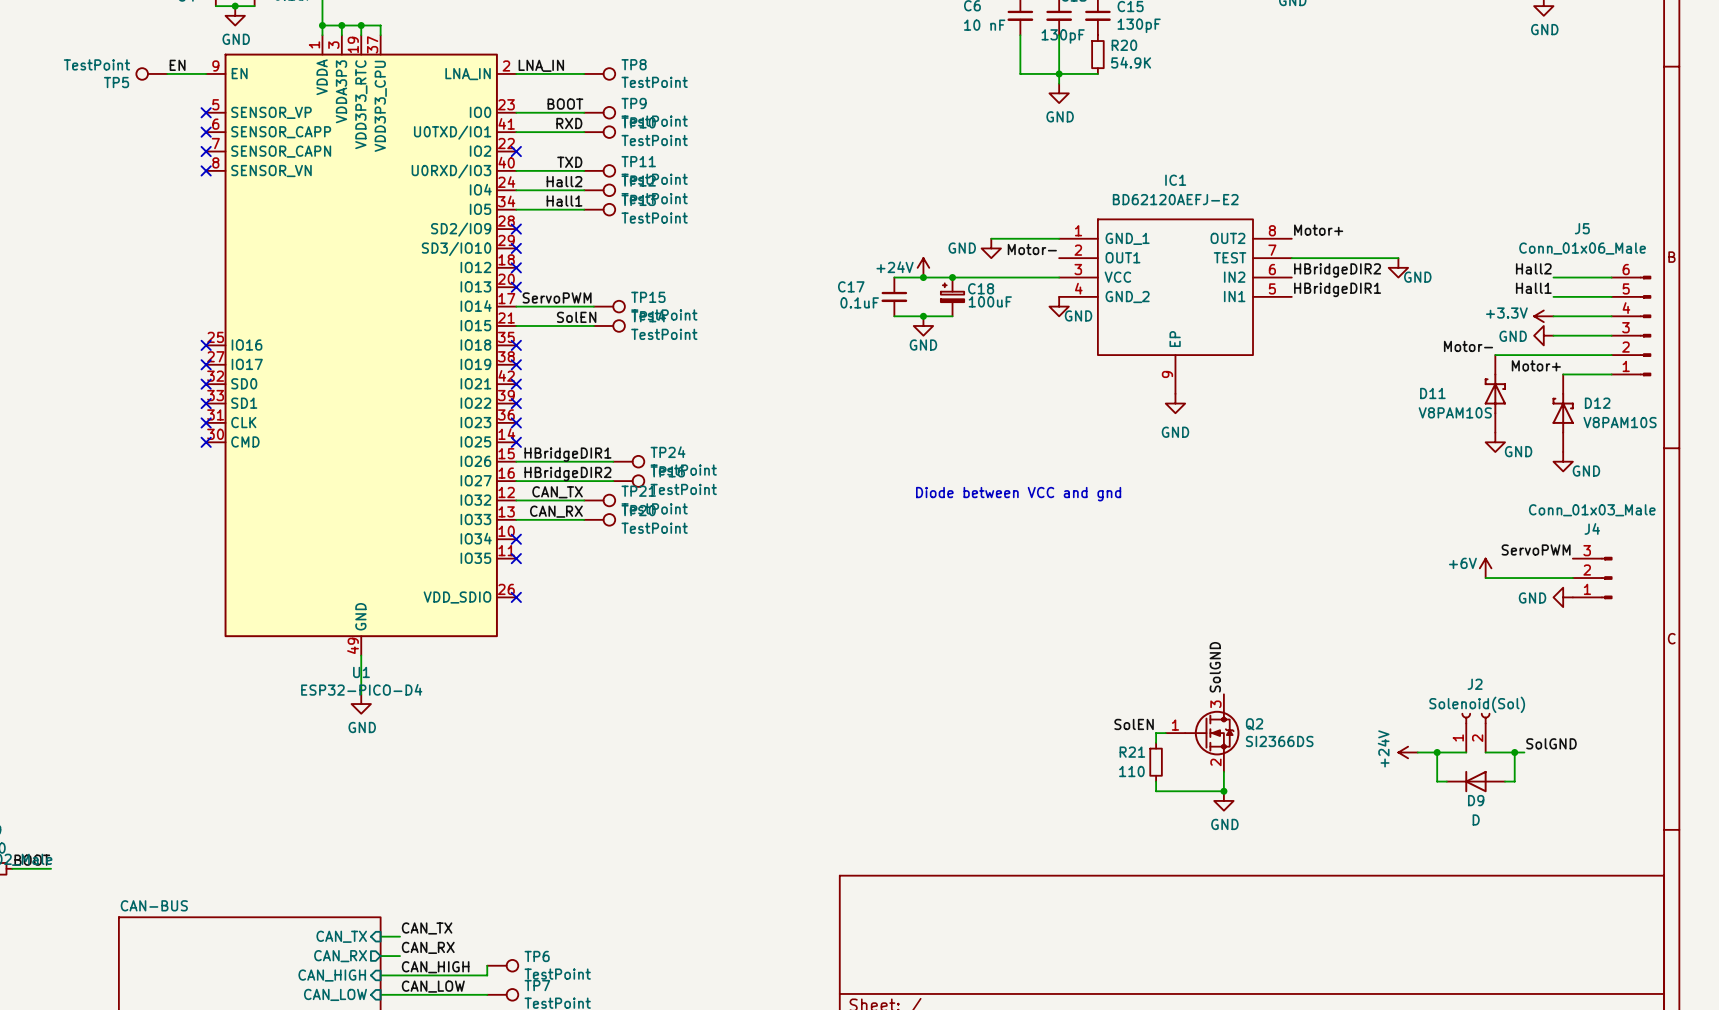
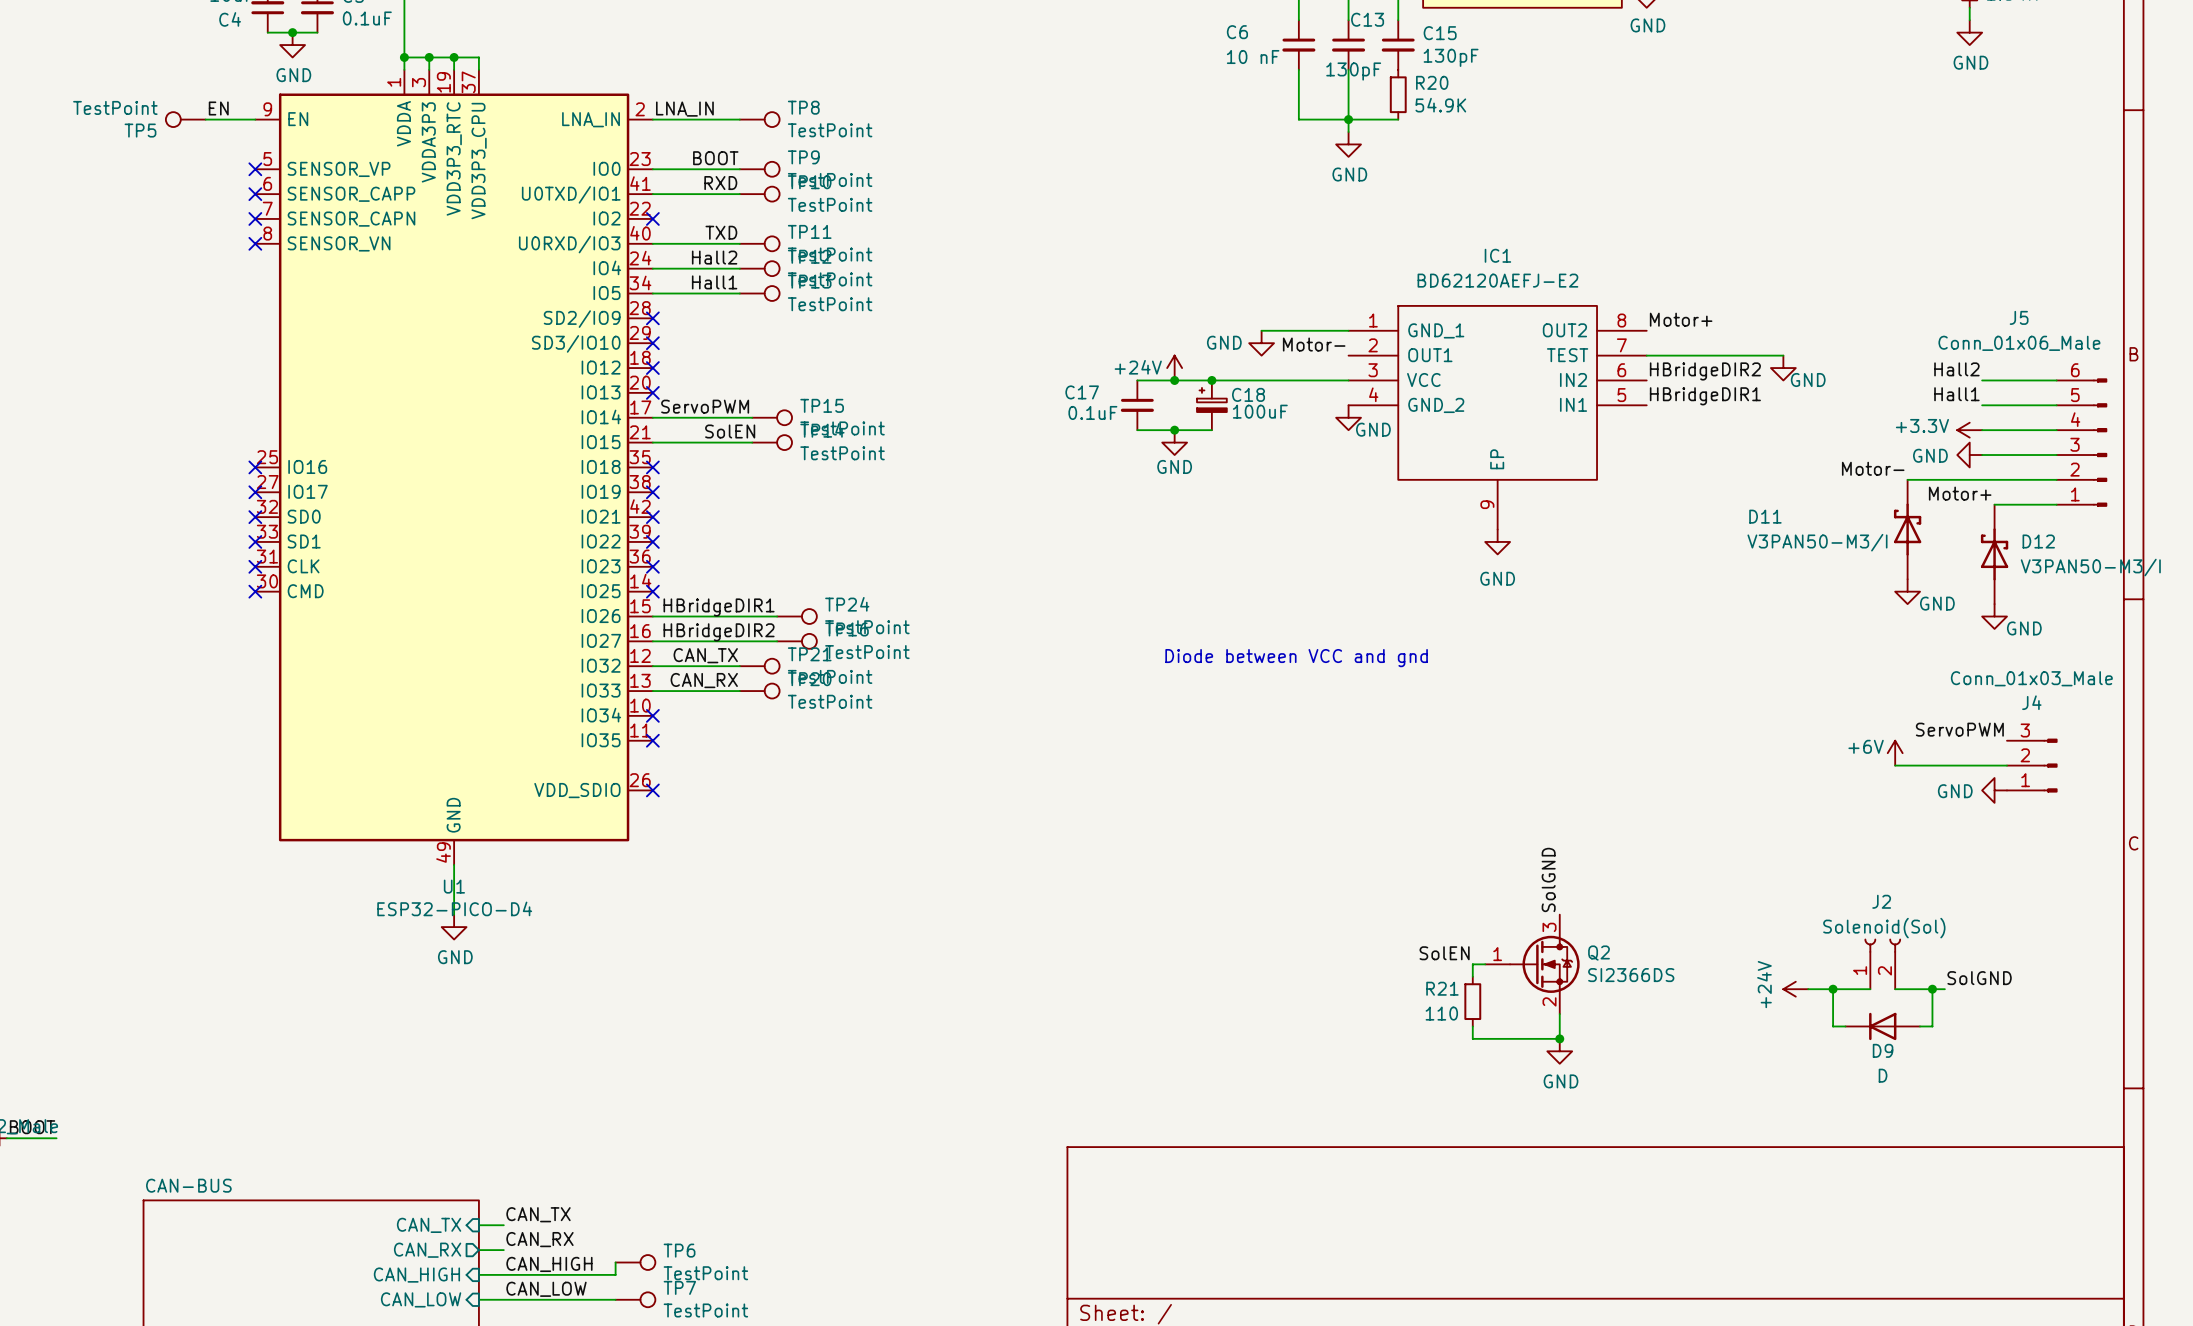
D11 name position: D11 (1432, 393) -> D11 (1765, 516)
D11 value: V8PAM10S (1455, 412) -> V3PAN50-M3/I (1817, 542)
D12 value: V8PAM10S (1620, 422) -> V3PAN50-M3/I (2090, 567)

